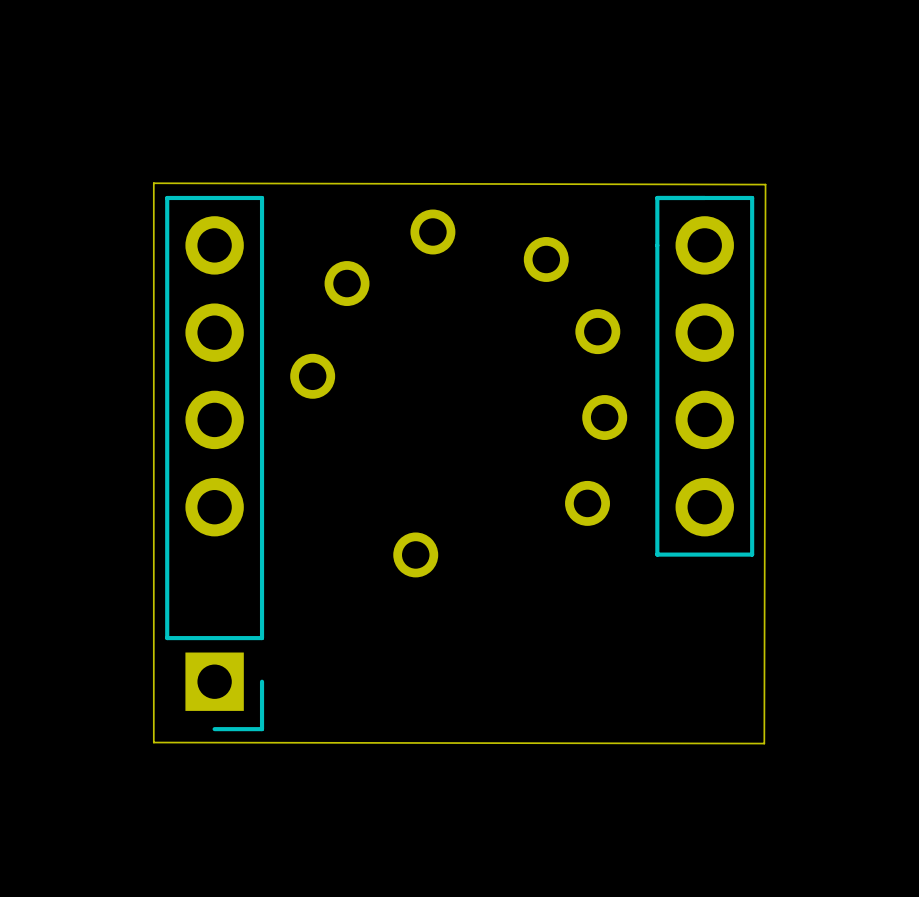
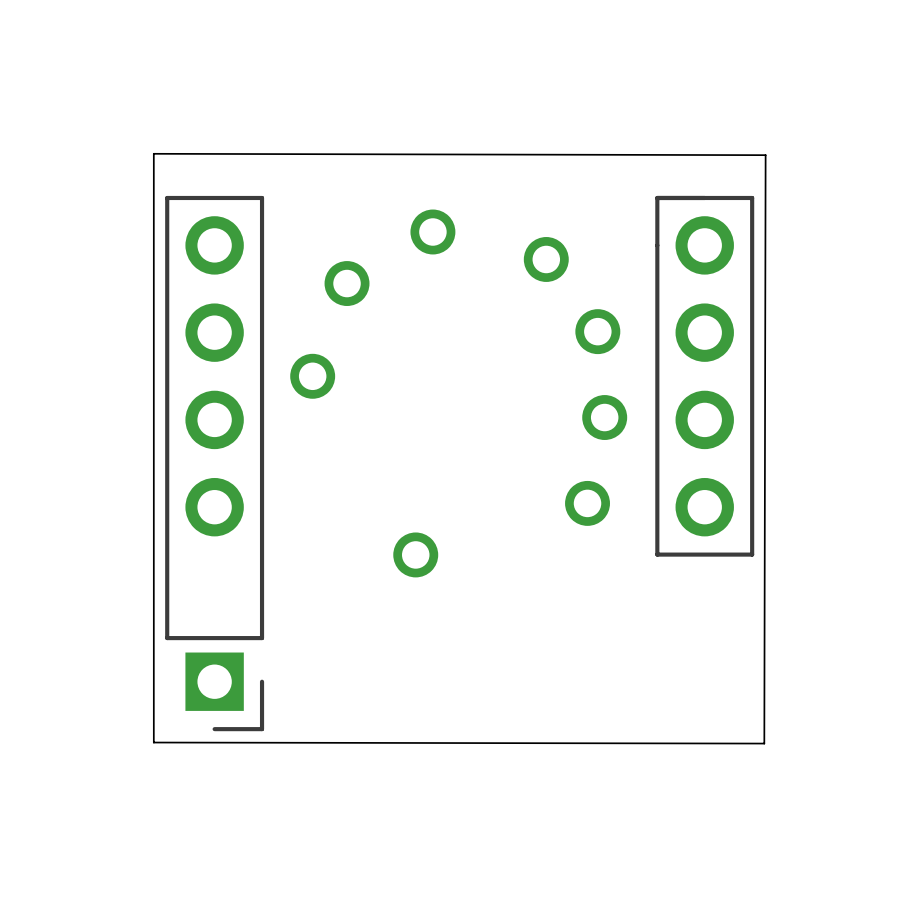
board edge: (153, 183) (765, 184) -> (153, 183) (153, 153) (765, 155) (765, 184)

